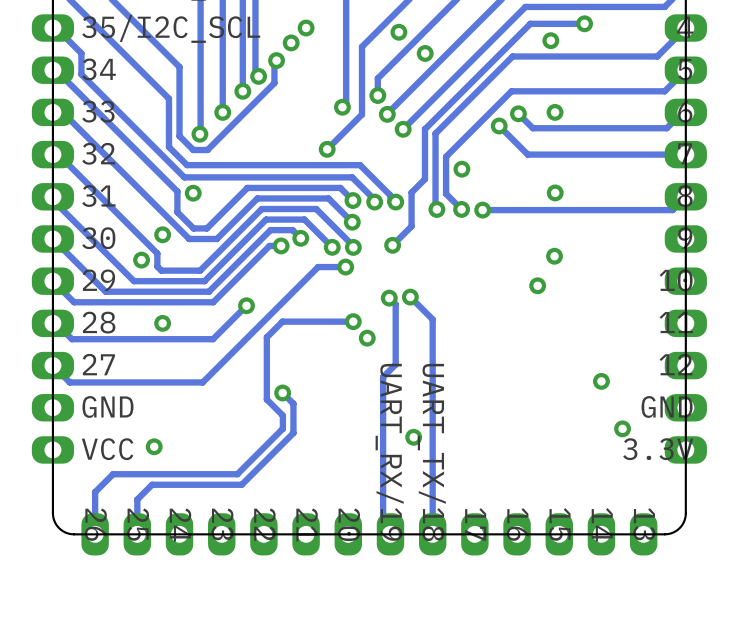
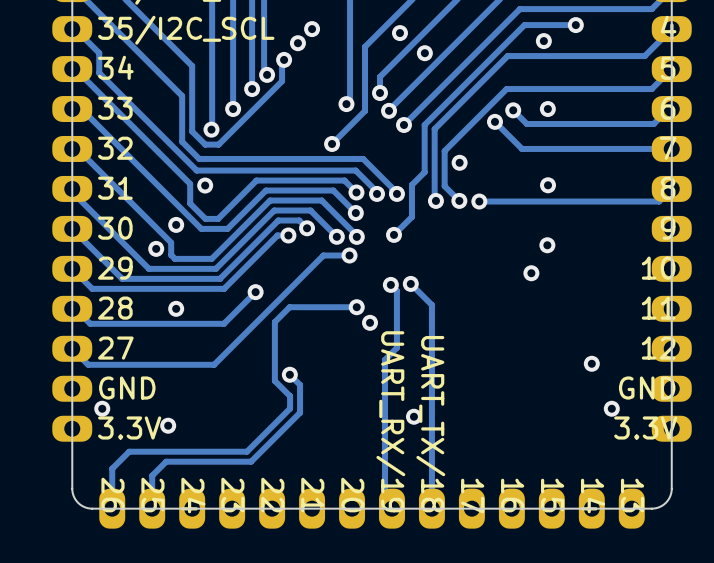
via: none -> (102, 408)
text: VCC (107, 449) -> 3.3V (129, 427)

